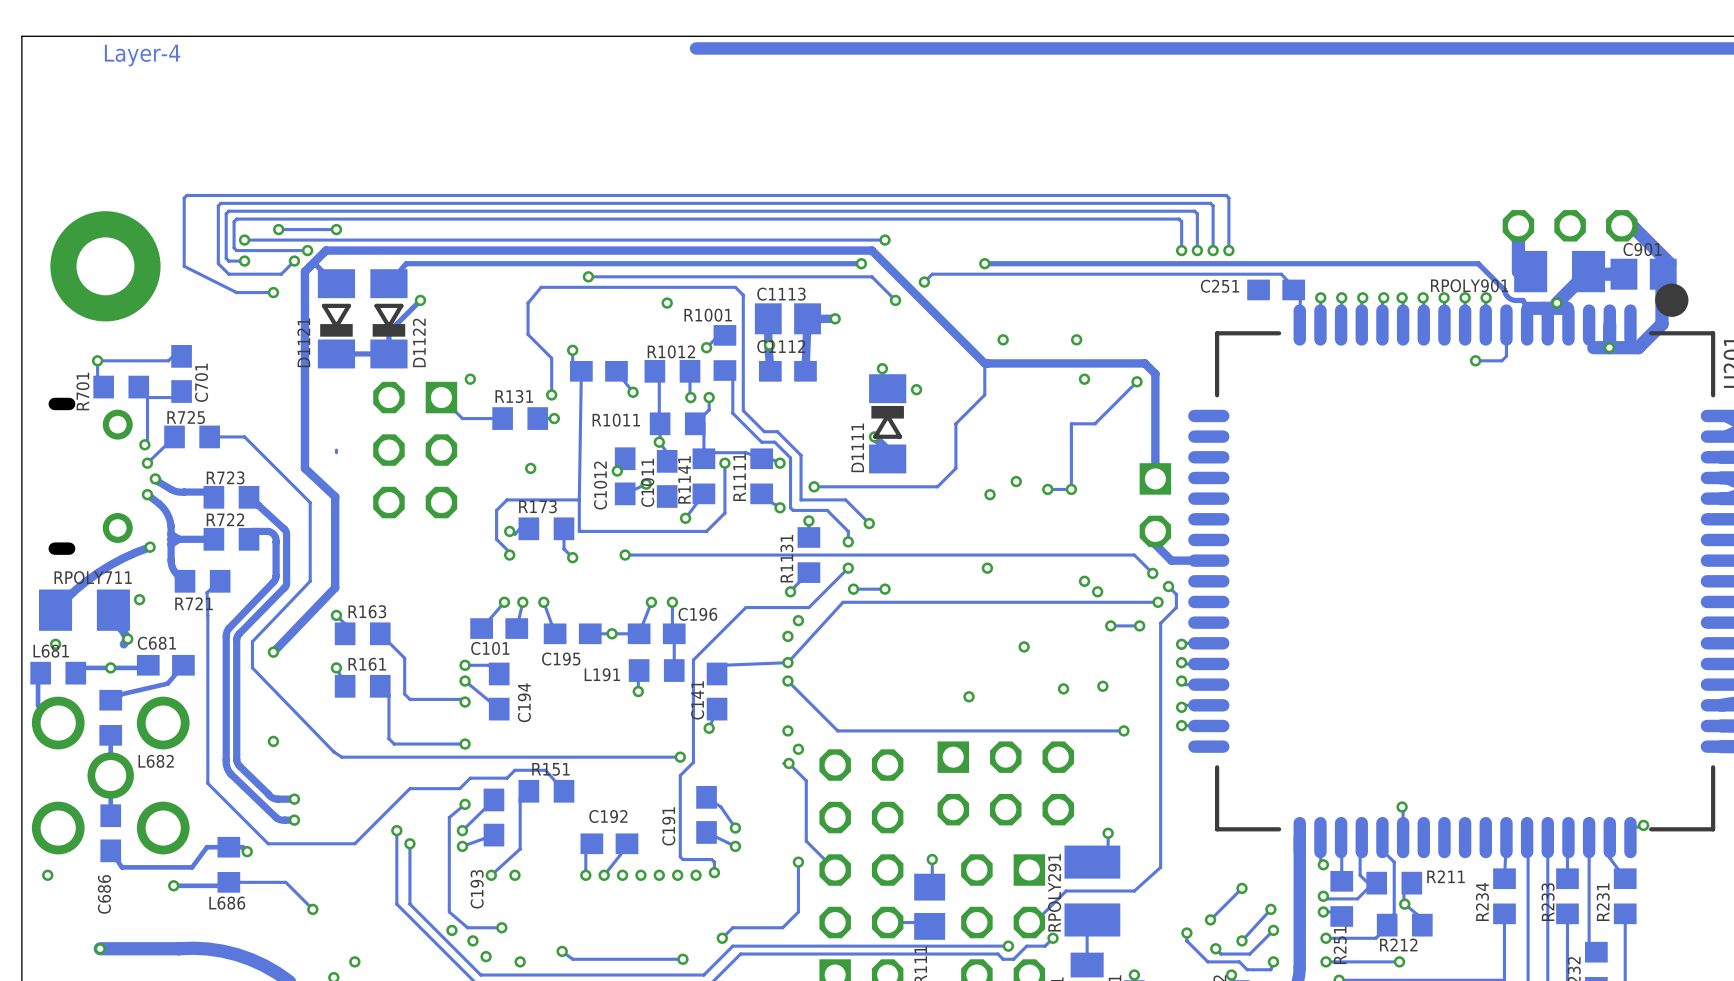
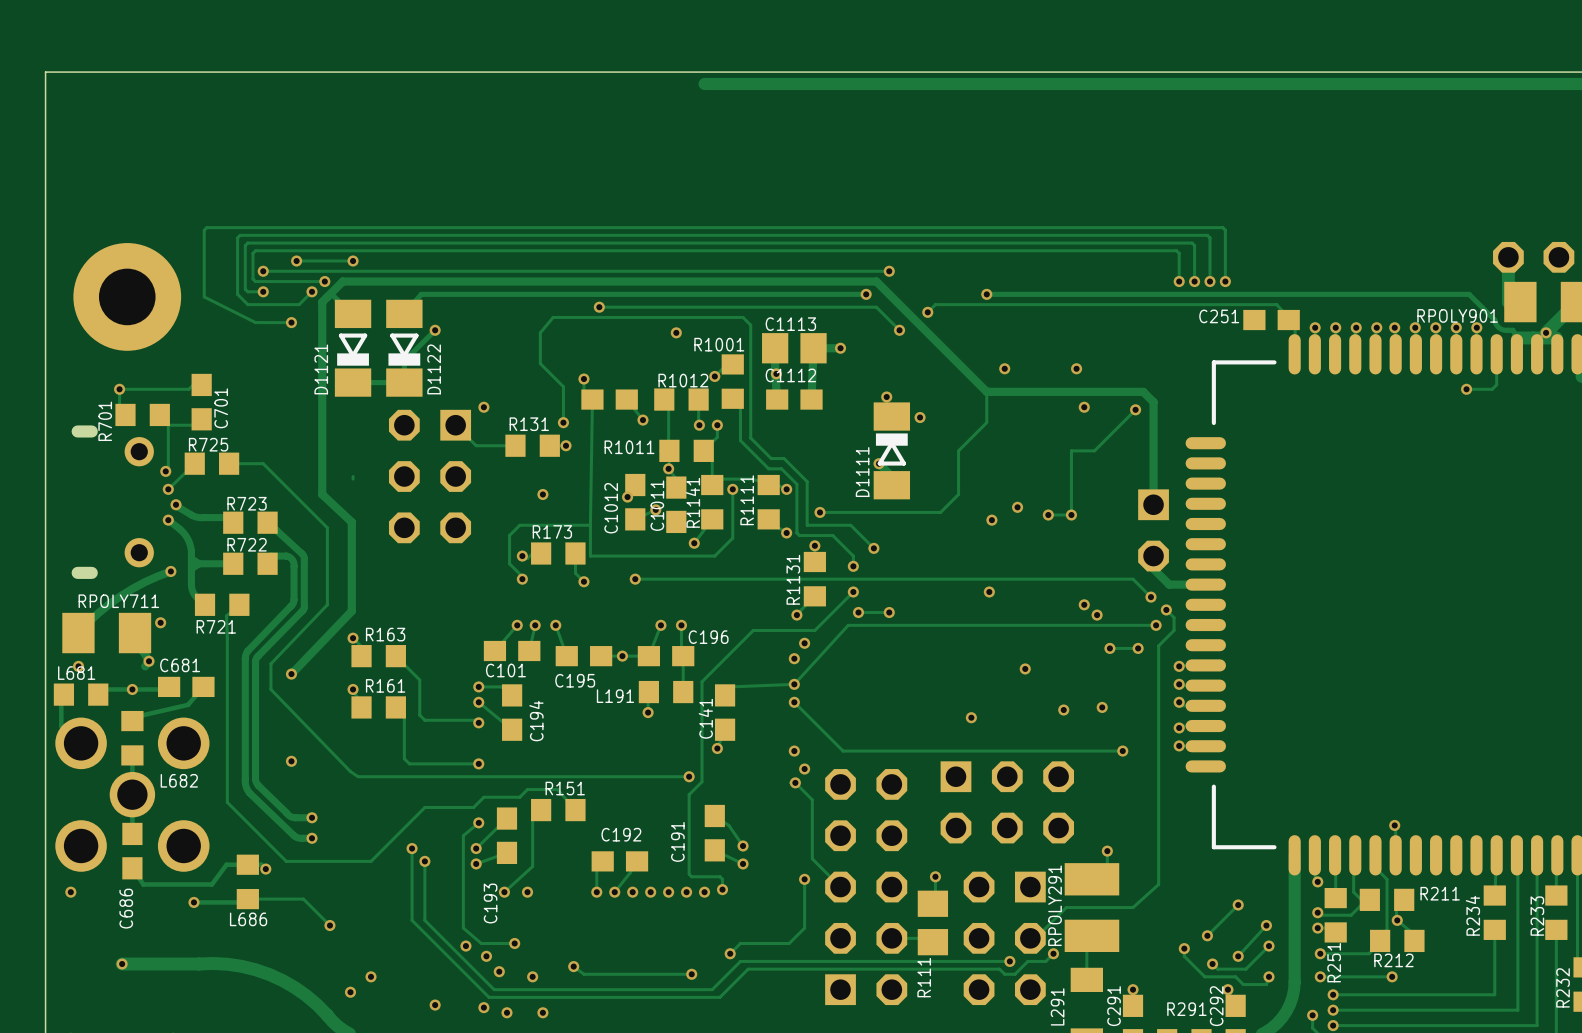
text: Layer-4 (142, 55) -> none

